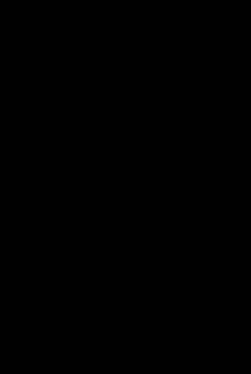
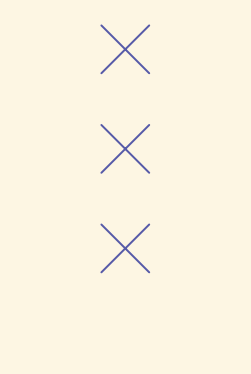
no-connect mark: none -> (125, 49)
no-connect mark: none -> (125, 148)
no-connect mark: none -> (125, 248)

